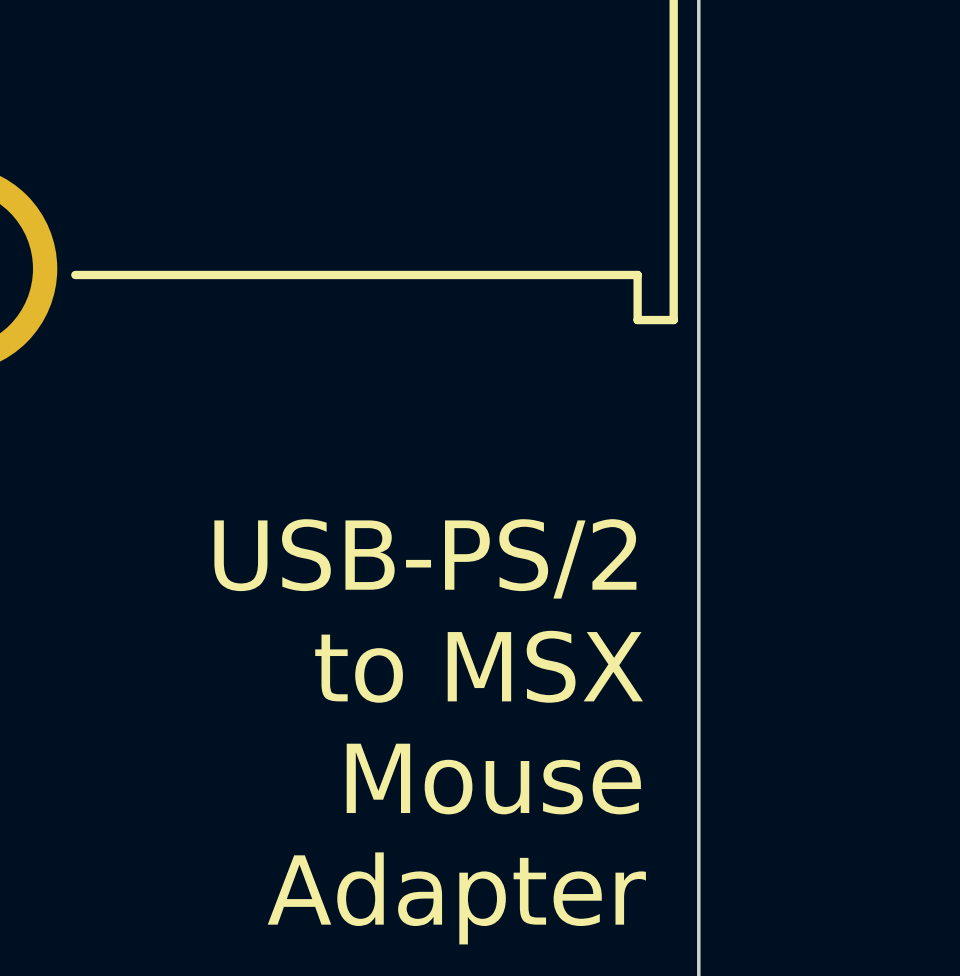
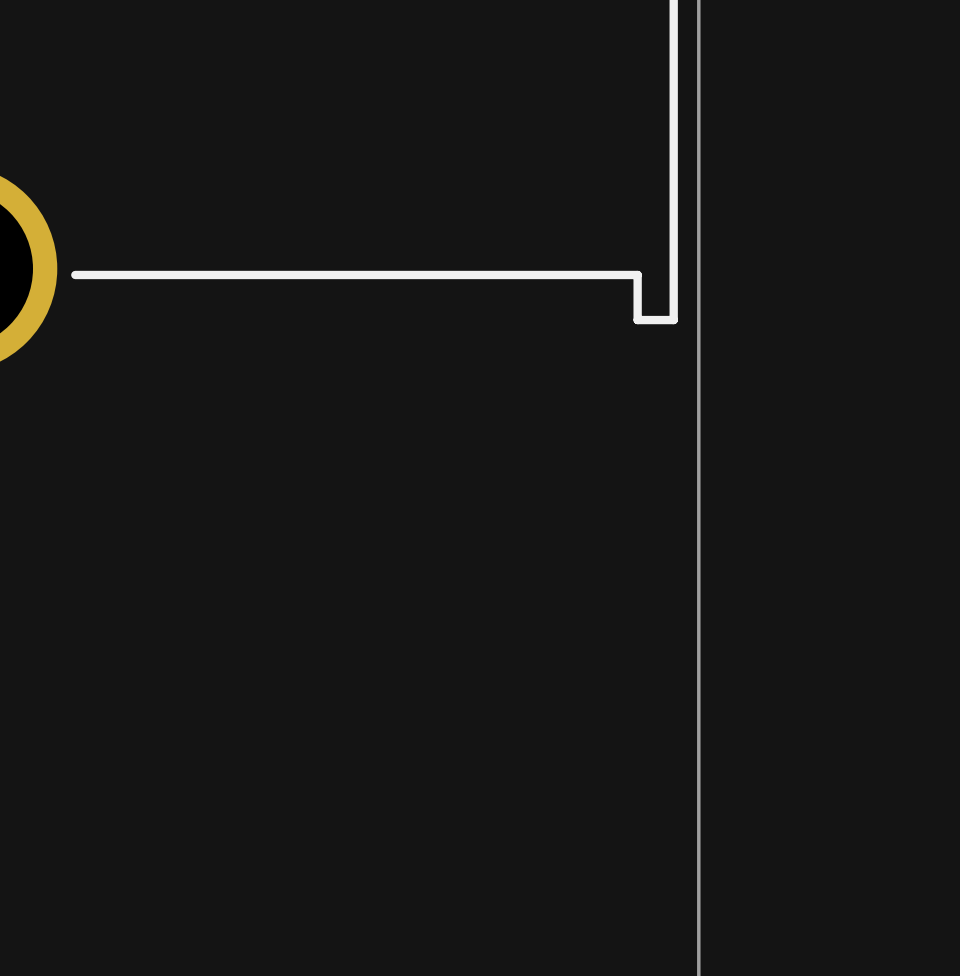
text: USB-PS/2 (425, 558) -> none
text: to MSX (479, 666) -> none
text: Mouse (493, 779) -> none
text: Adapter (456, 898) -> none

